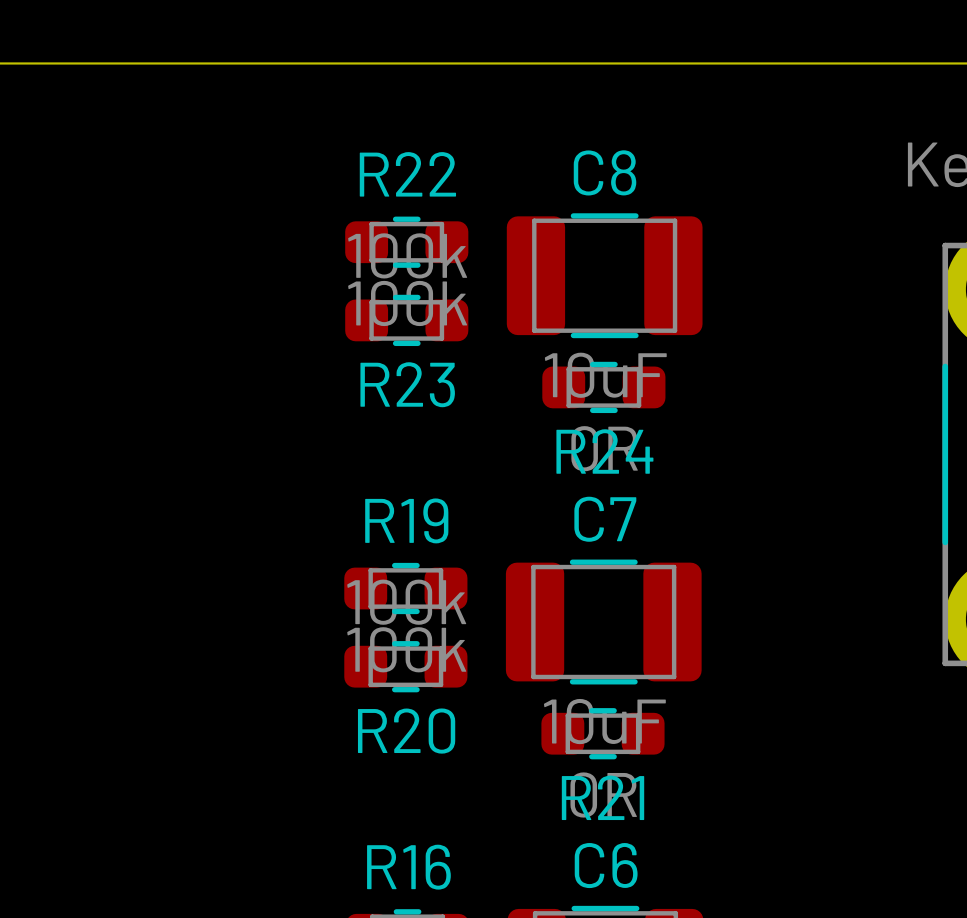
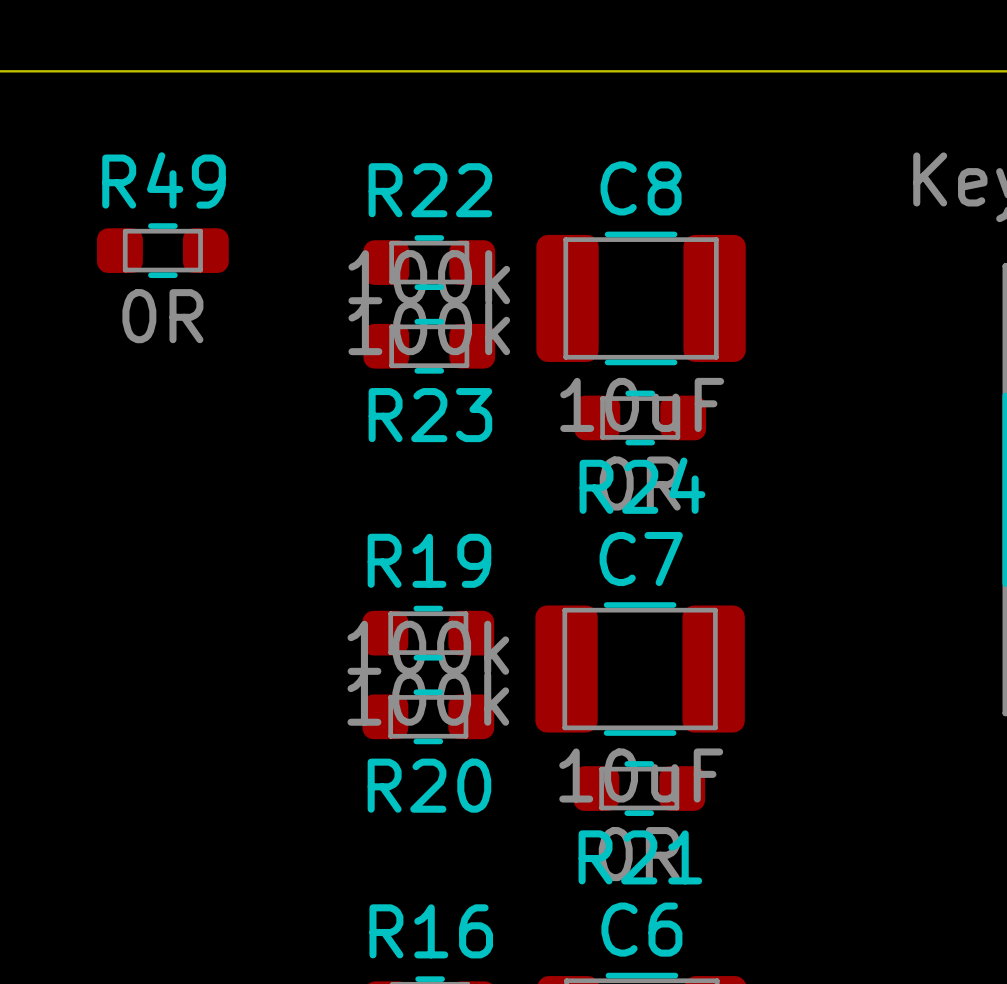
R49: none -> 0R (162, 250)

